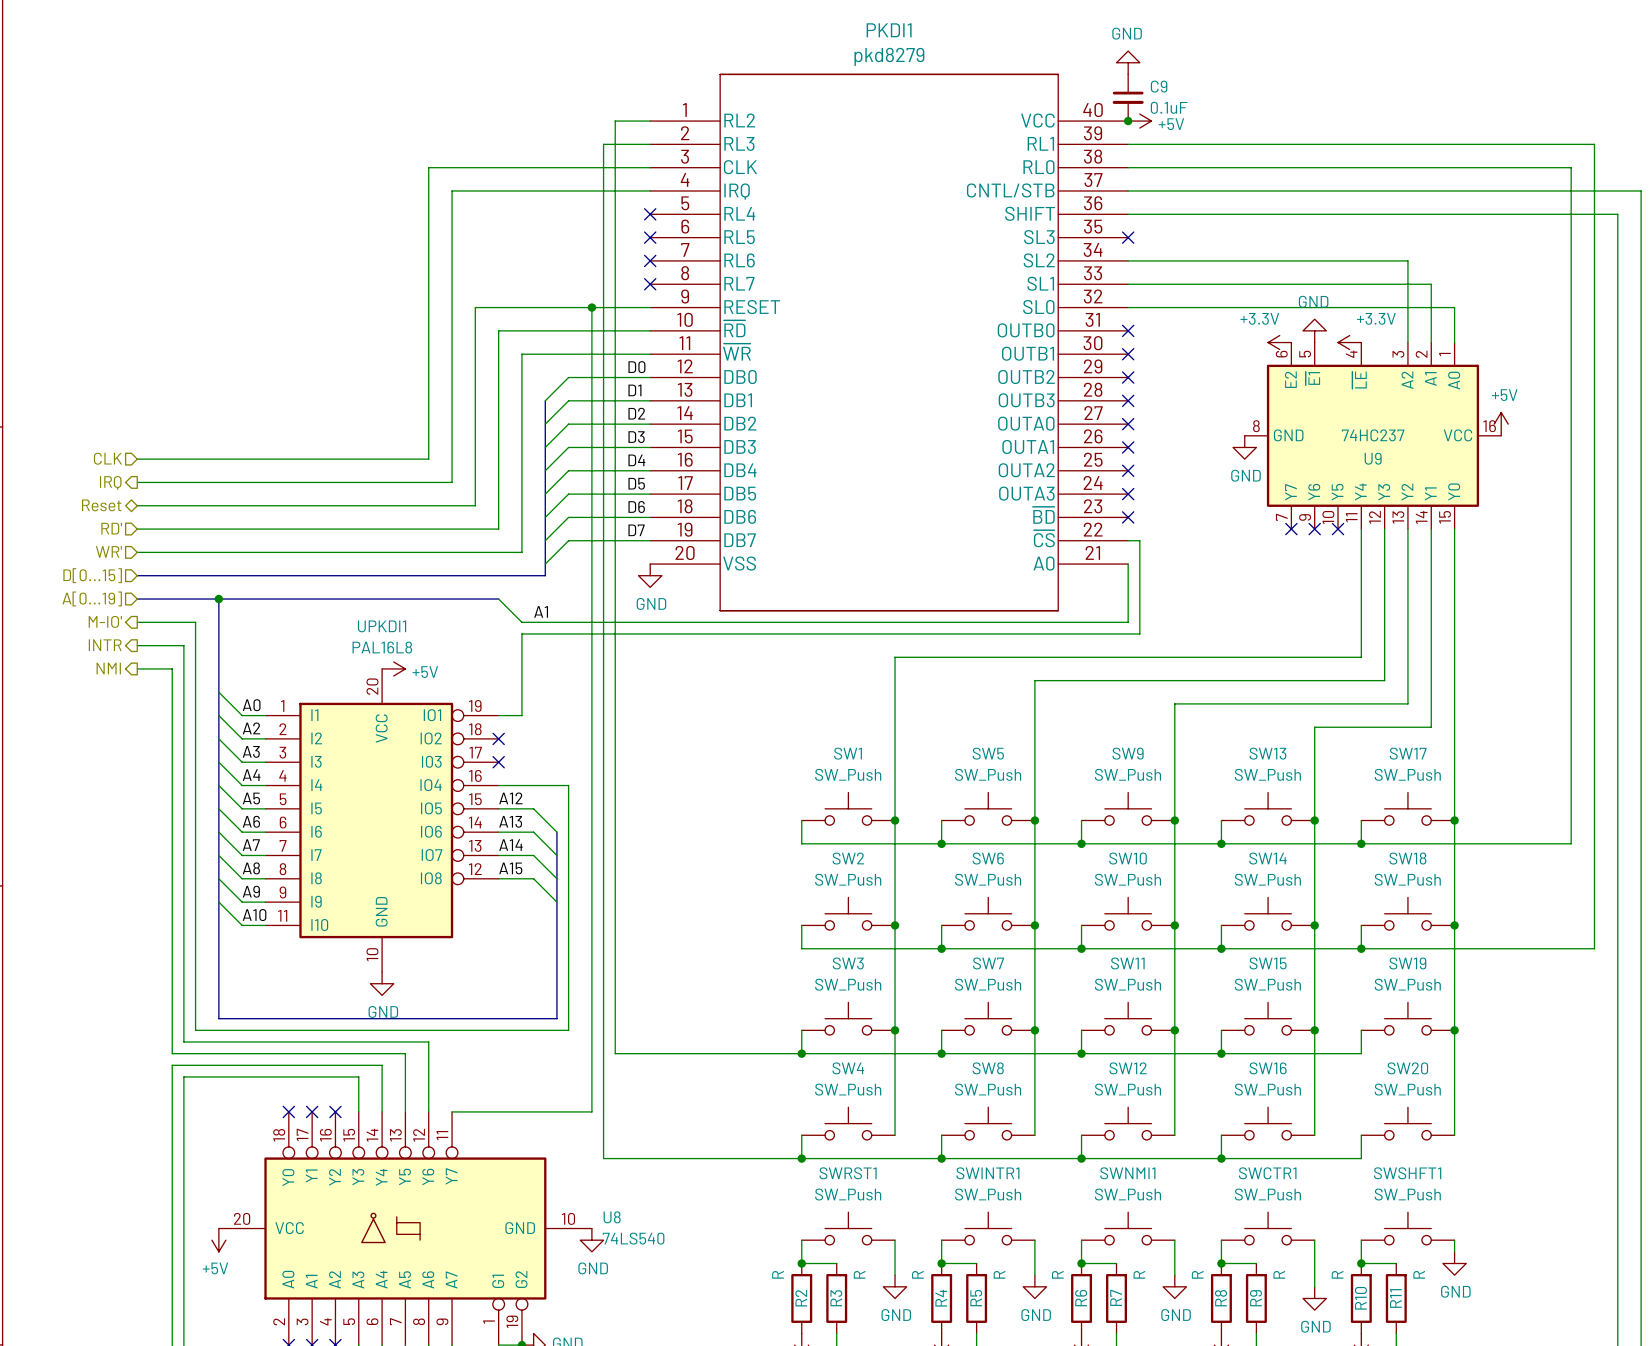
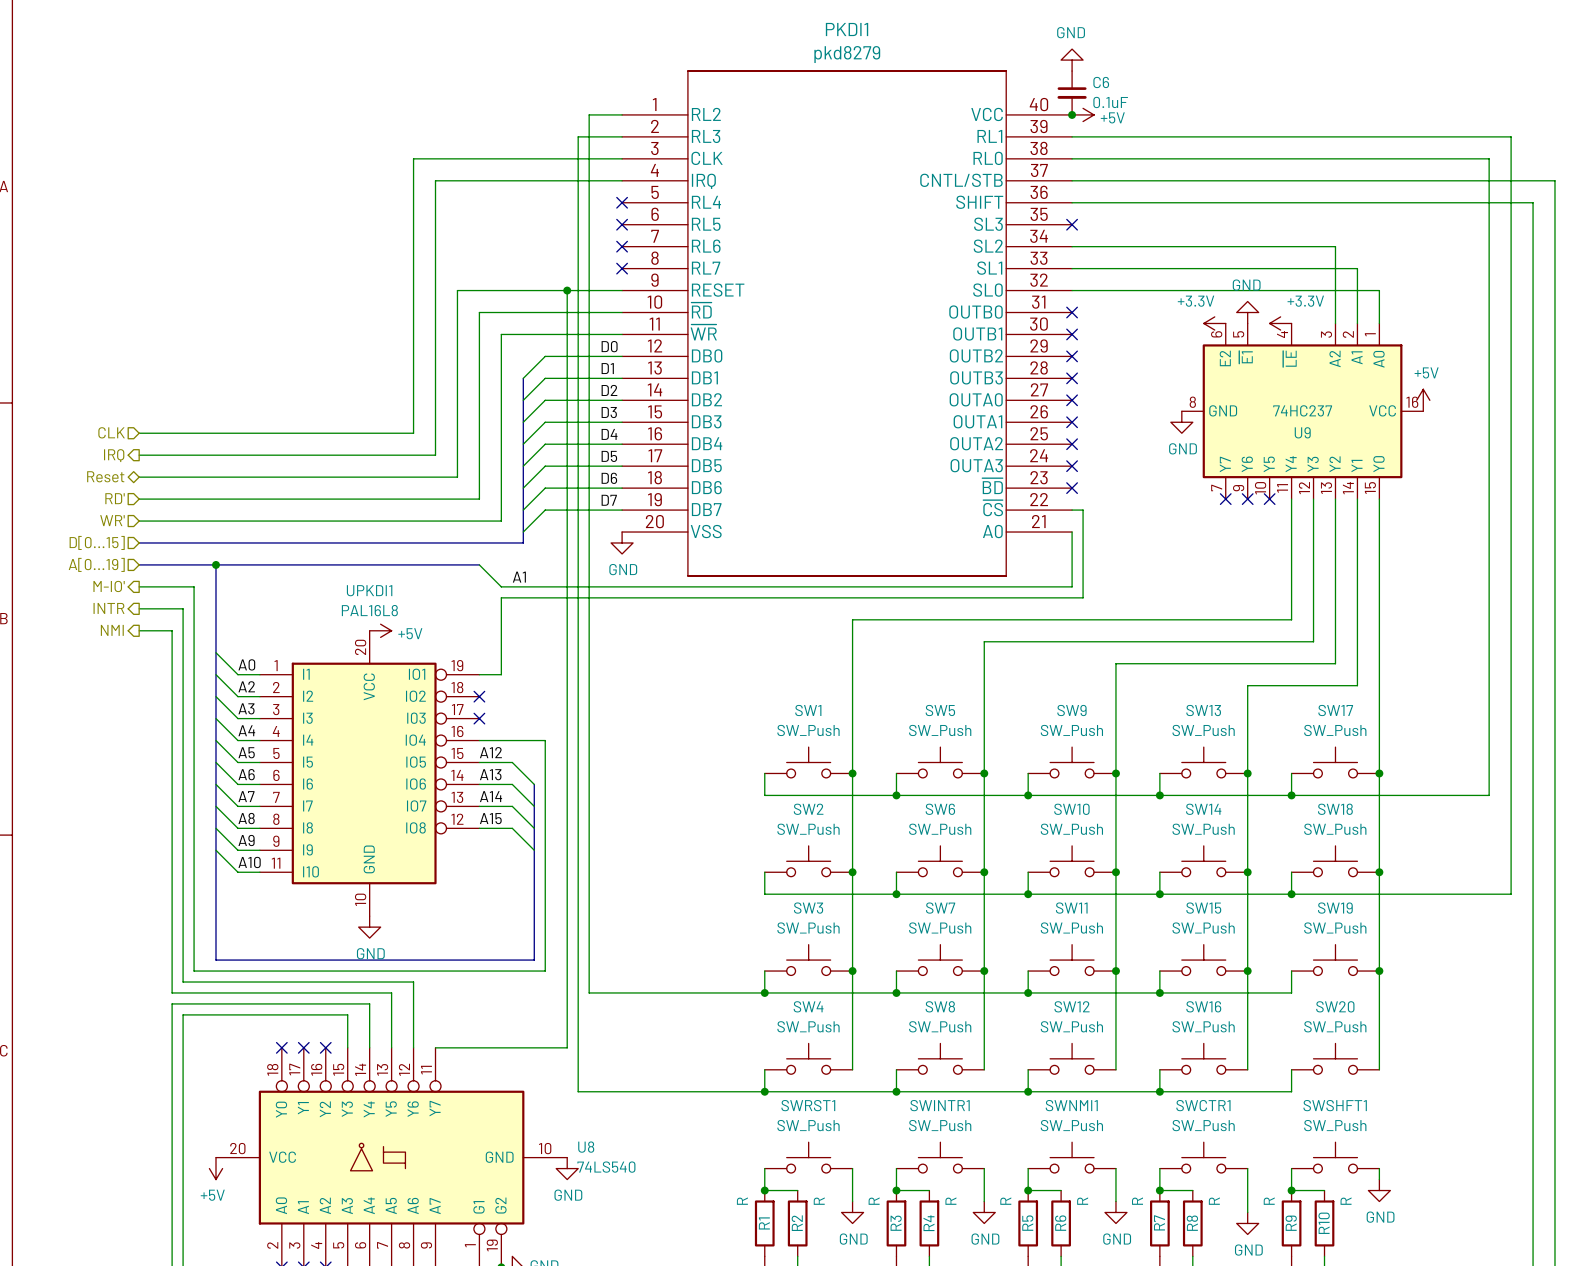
C9 name: C9 (1159, 86) -> C6 (1101, 82)
R7 name: R7 (1116, 1297) -> R6 (1060, 1223)
R2 name: R2 (801, 1298) -> R1 (764, 1223)
R3 name: R3 (836, 1298) -> R2 (797, 1223)
R4 name: R4 (941, 1298) -> R3 (896, 1223)
R5 name: R5 (976, 1298) -> R4 (928, 1223)
R6 name: R6 (1081, 1298) -> R5 (1027, 1223)
R8 name: R8 (1220, 1298) -> R7 (1159, 1222)
R9 name: R9 (1255, 1298) -> R8 (1192, 1223)
R10 name: R10 (1360, 1298) -> R9 (1291, 1223)
R11 name: R11 (1395, 1298) -> R10 (1324, 1223)

